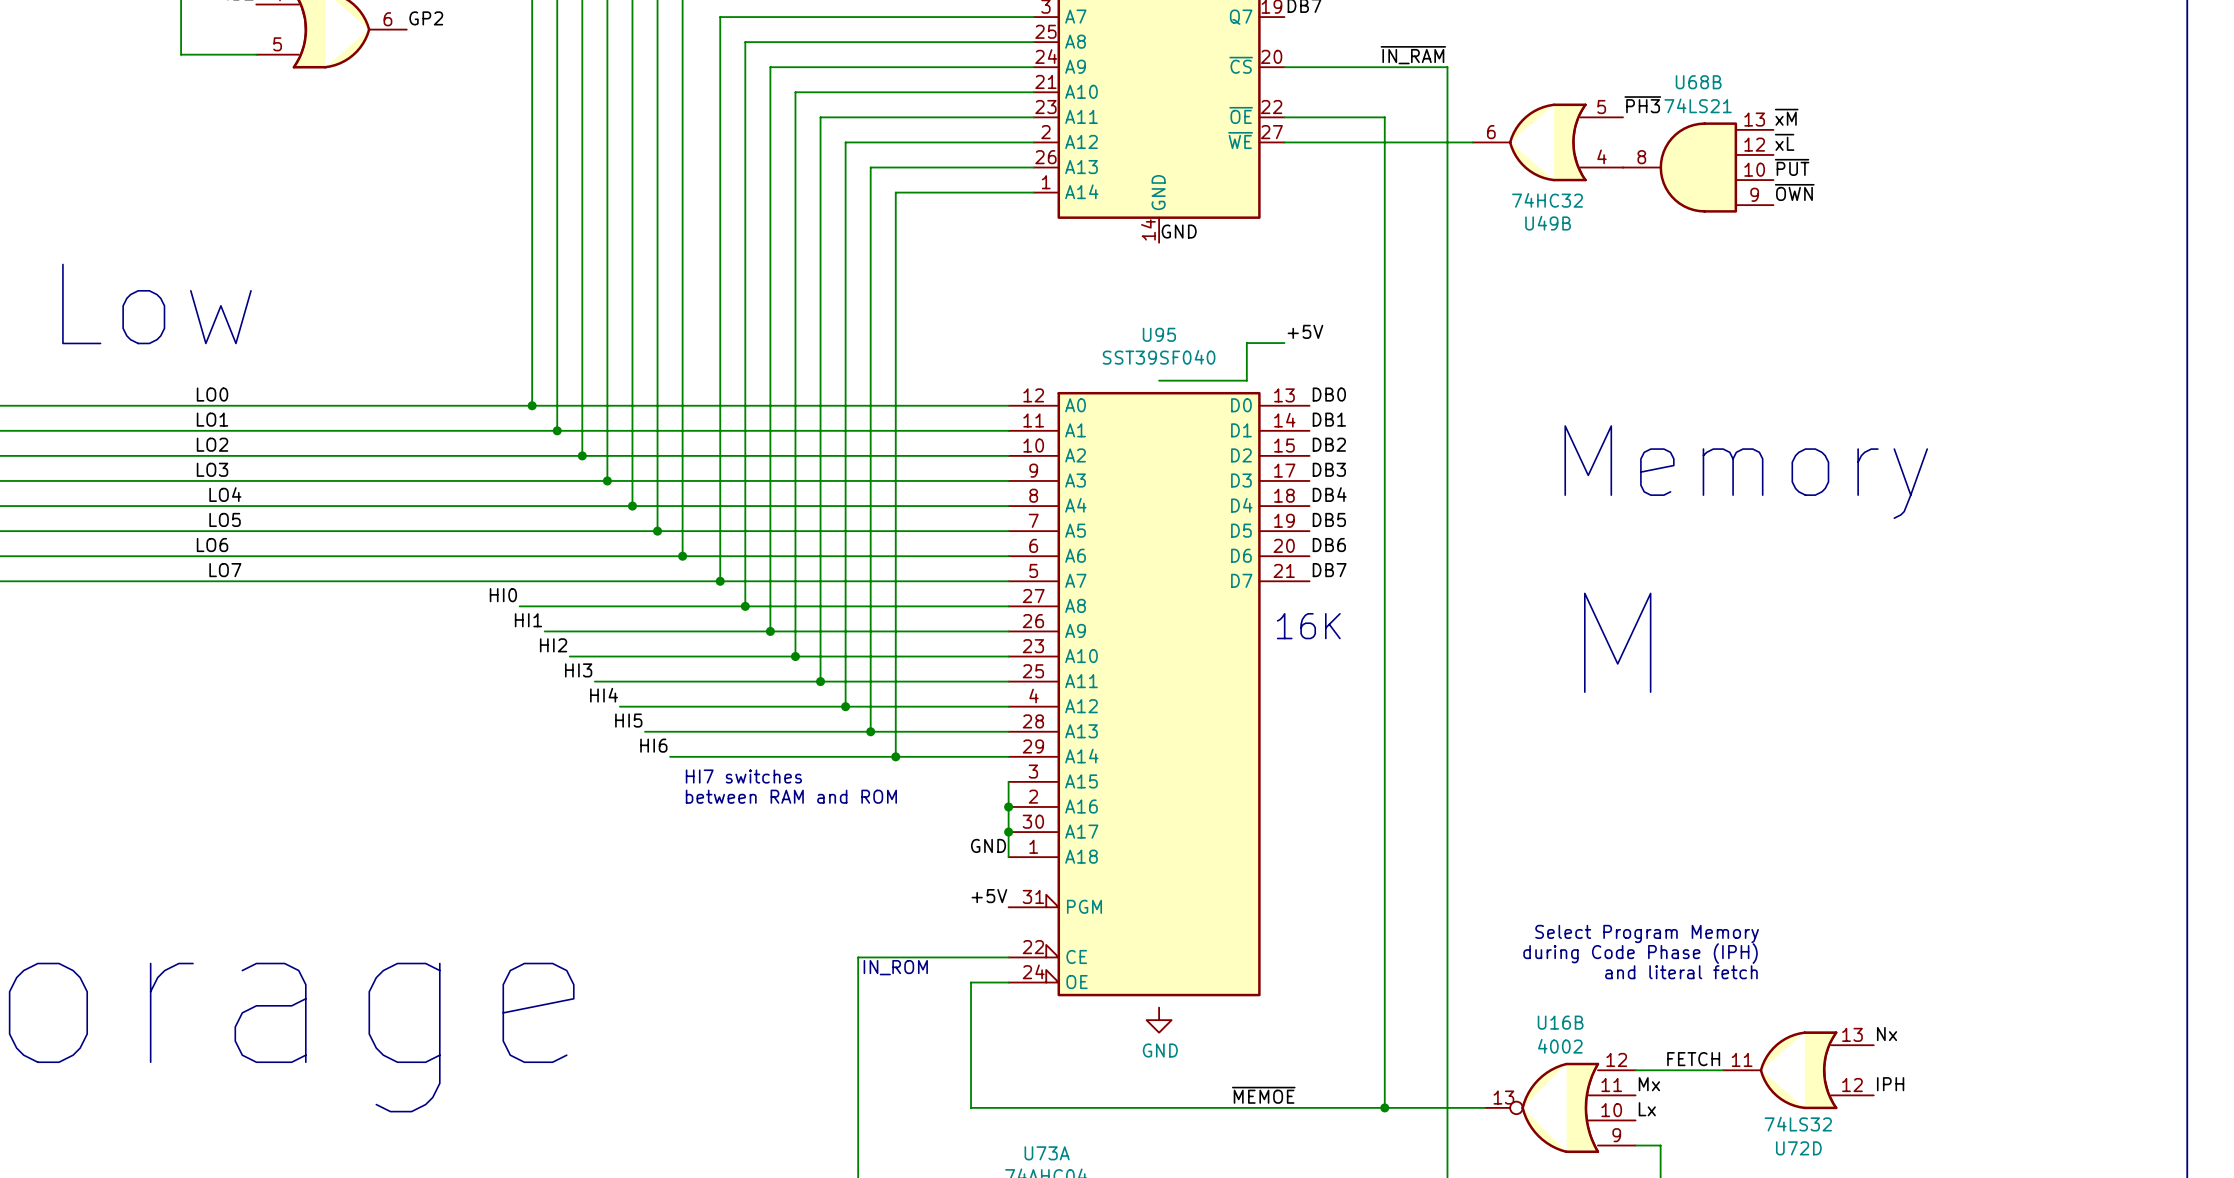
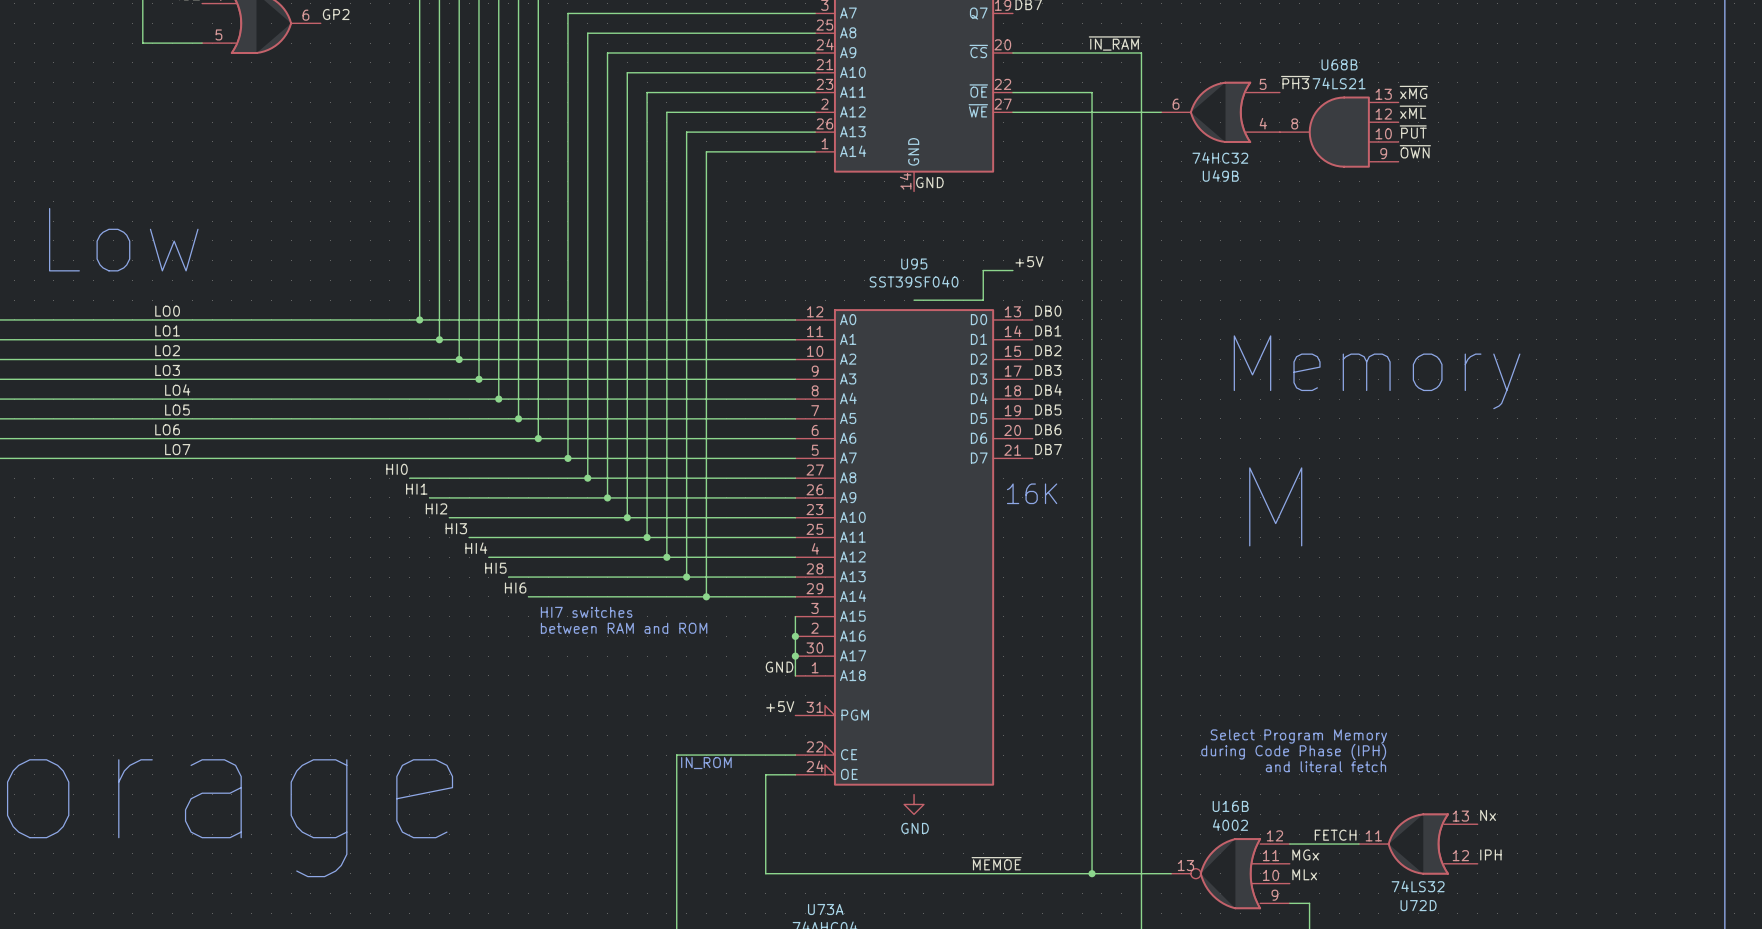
label: ~{xM} (1786, 117) -> ~{xMG} (1413, 92)
label: ~{xL} (1784, 142) -> ~{xML} (1413, 112)
label: Mx (1649, 1084) -> MGx (1305, 854)
label: Lx (1647, 1109) -> MLx (1304, 874)

